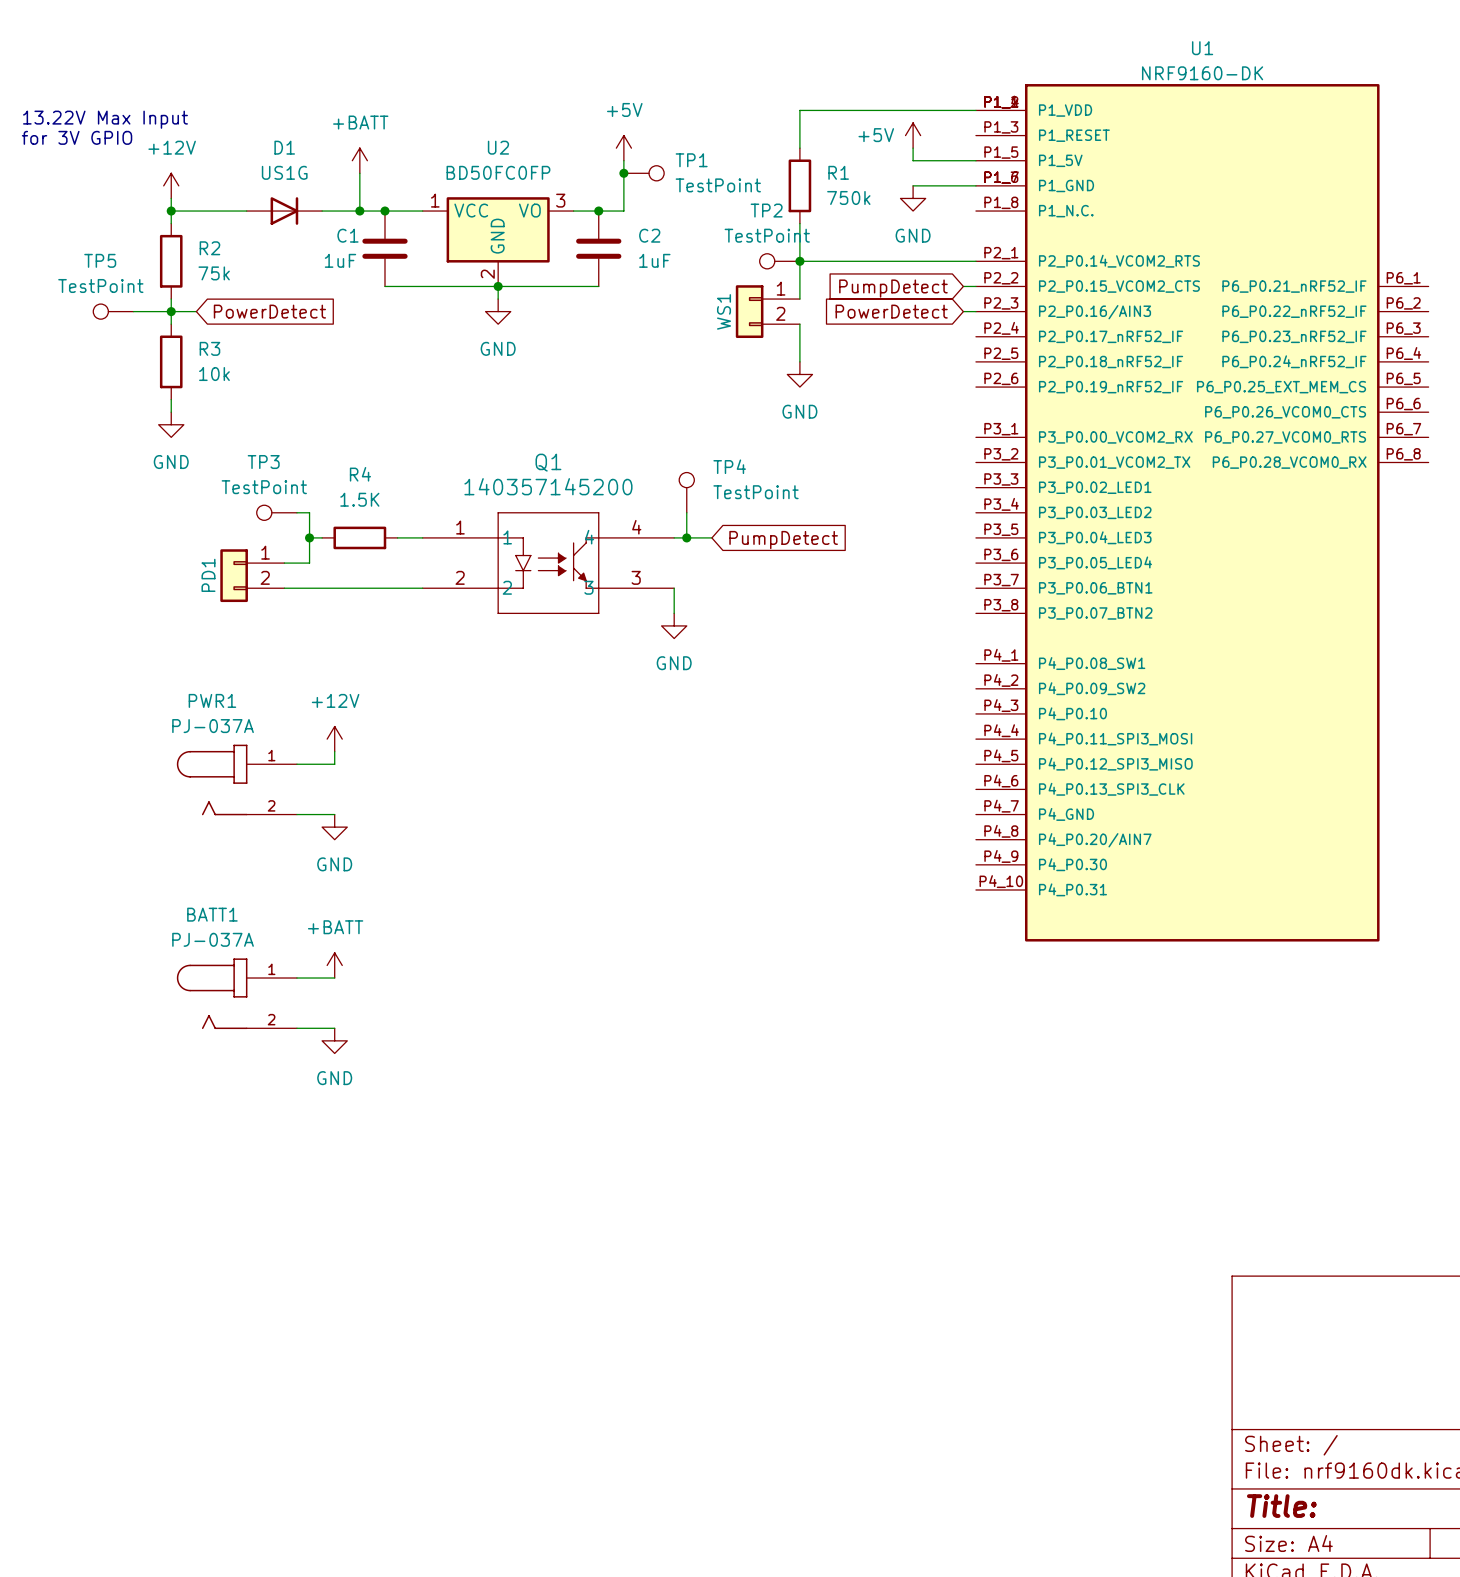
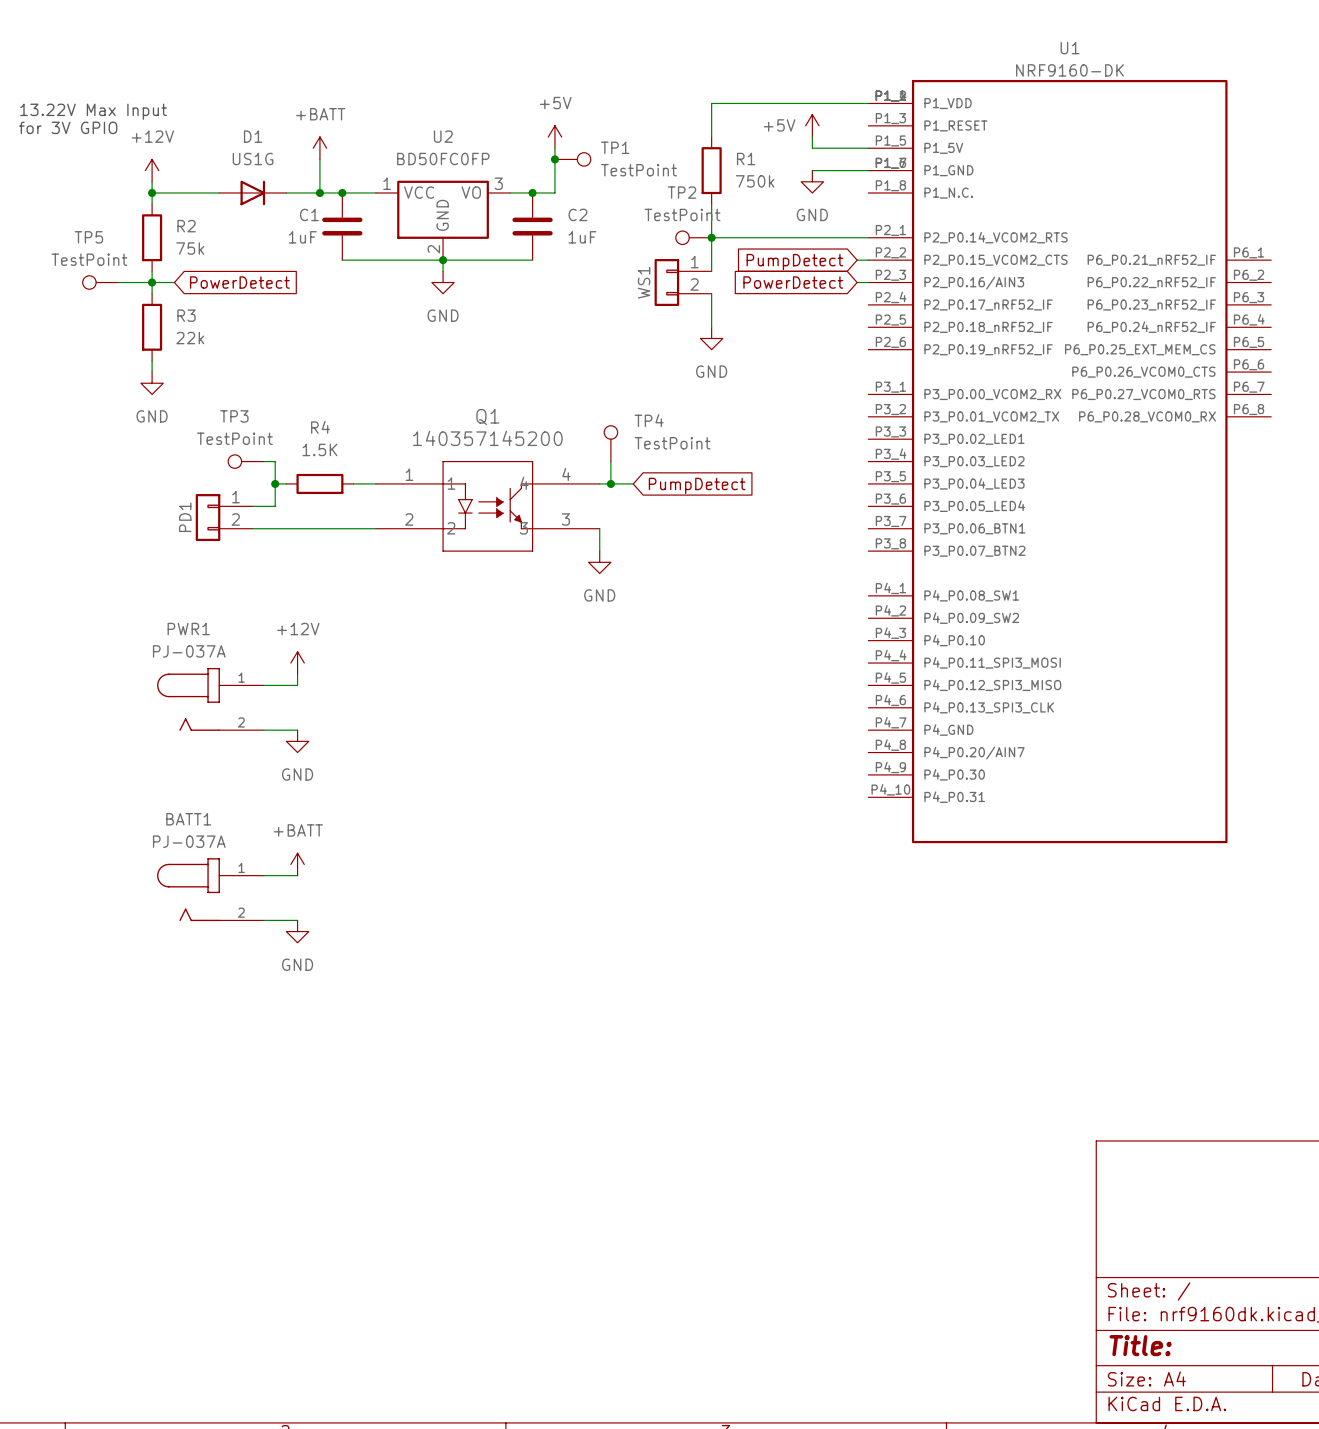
R3 value: 10k (214, 374) -> 22k (190, 338)

